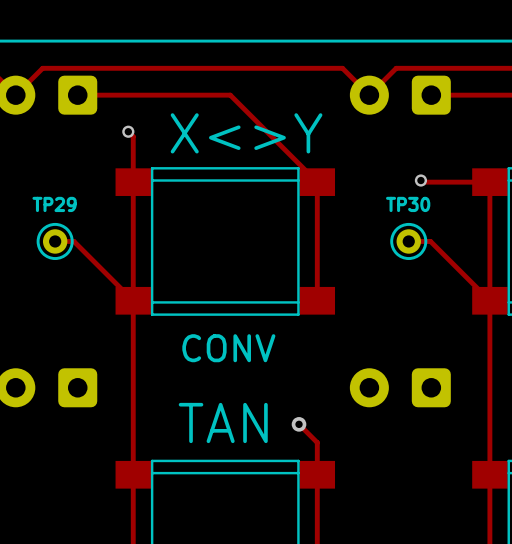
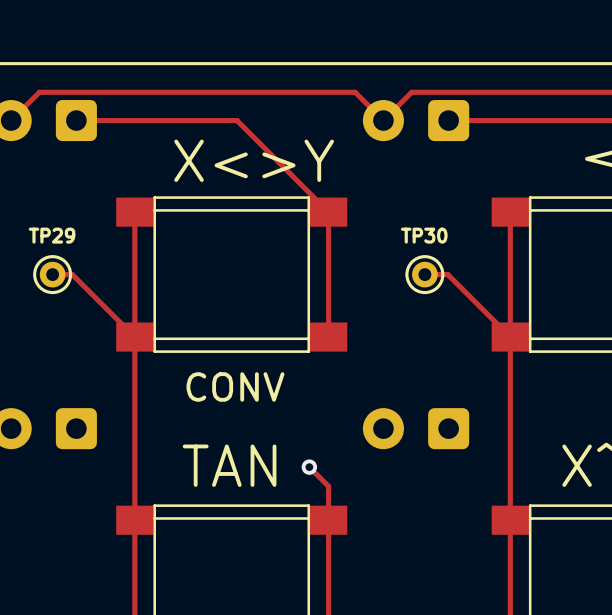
track: (128, 131) (133, 136) (133, 182) -> none
via: (128, 131) -> none
track: (420, 180) (422, 182) (489, 182) -> none
via: (420, 180) -> none

